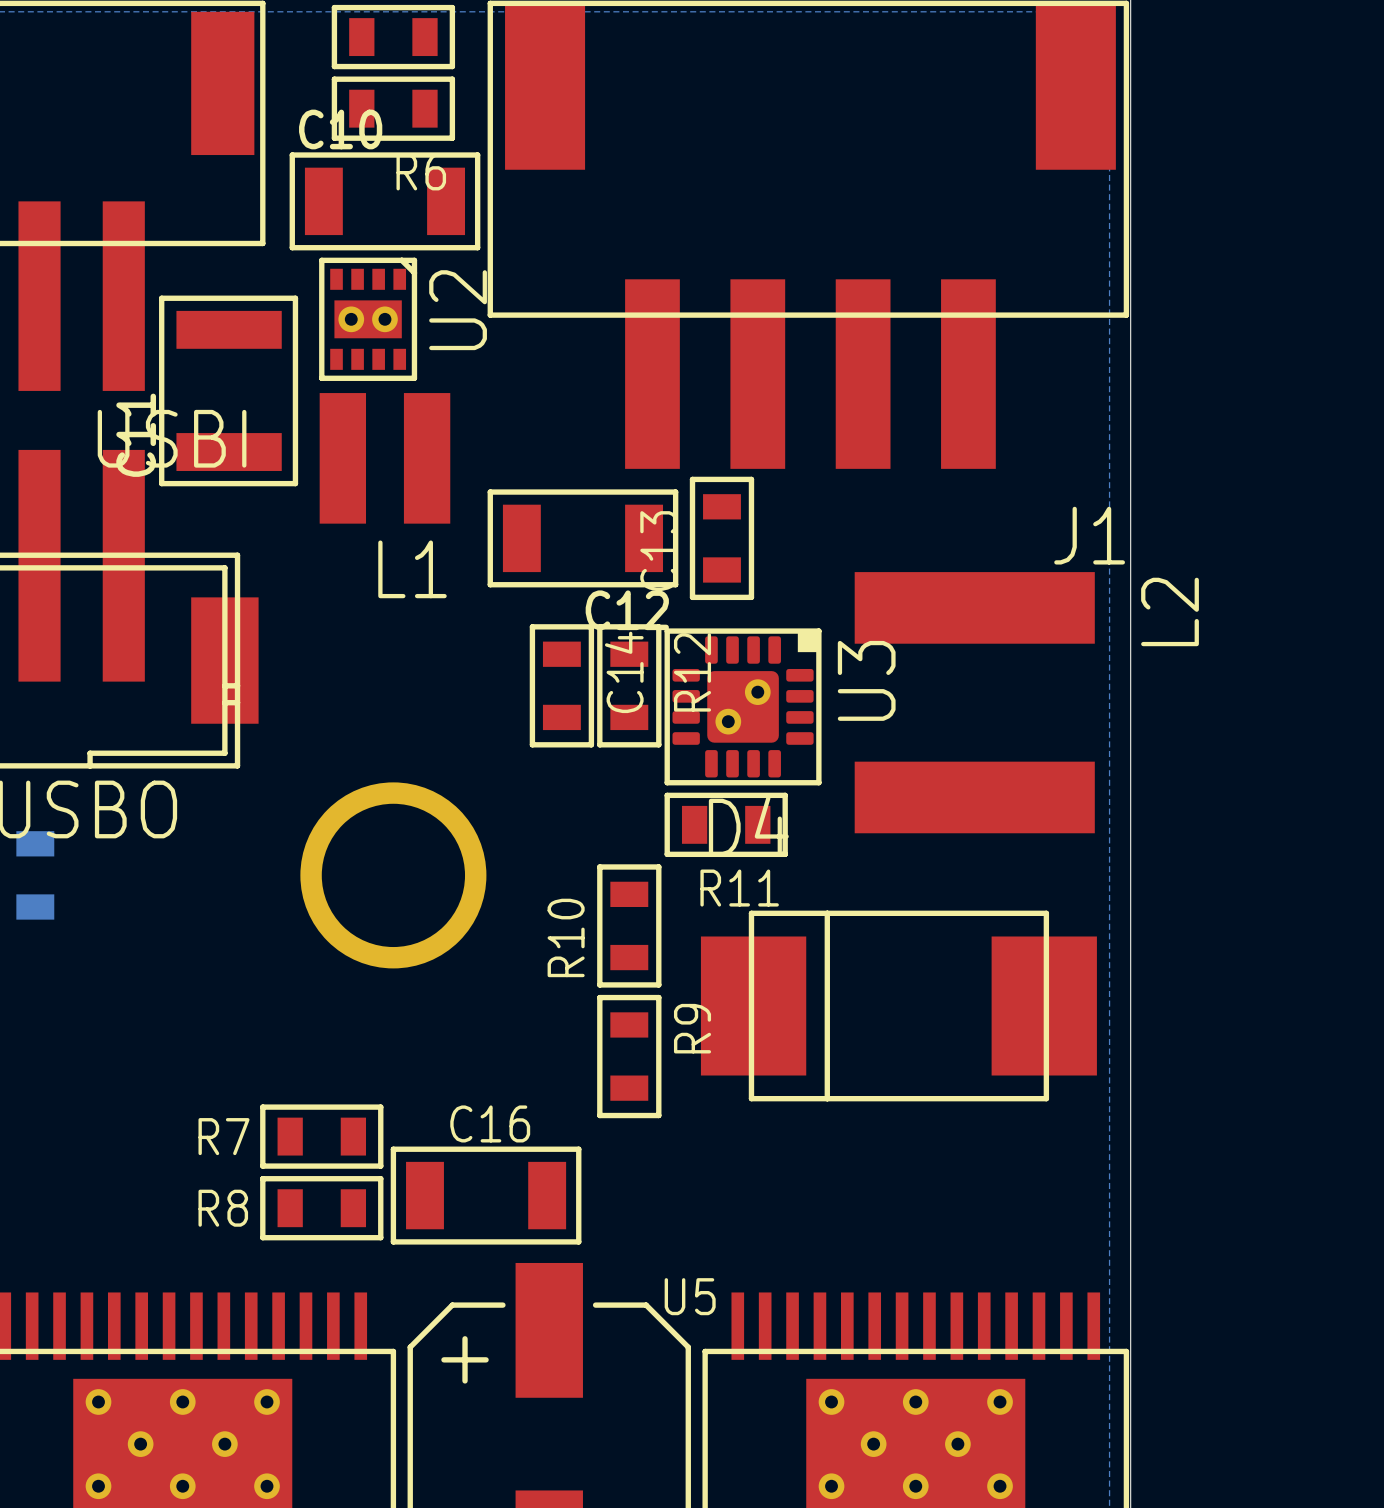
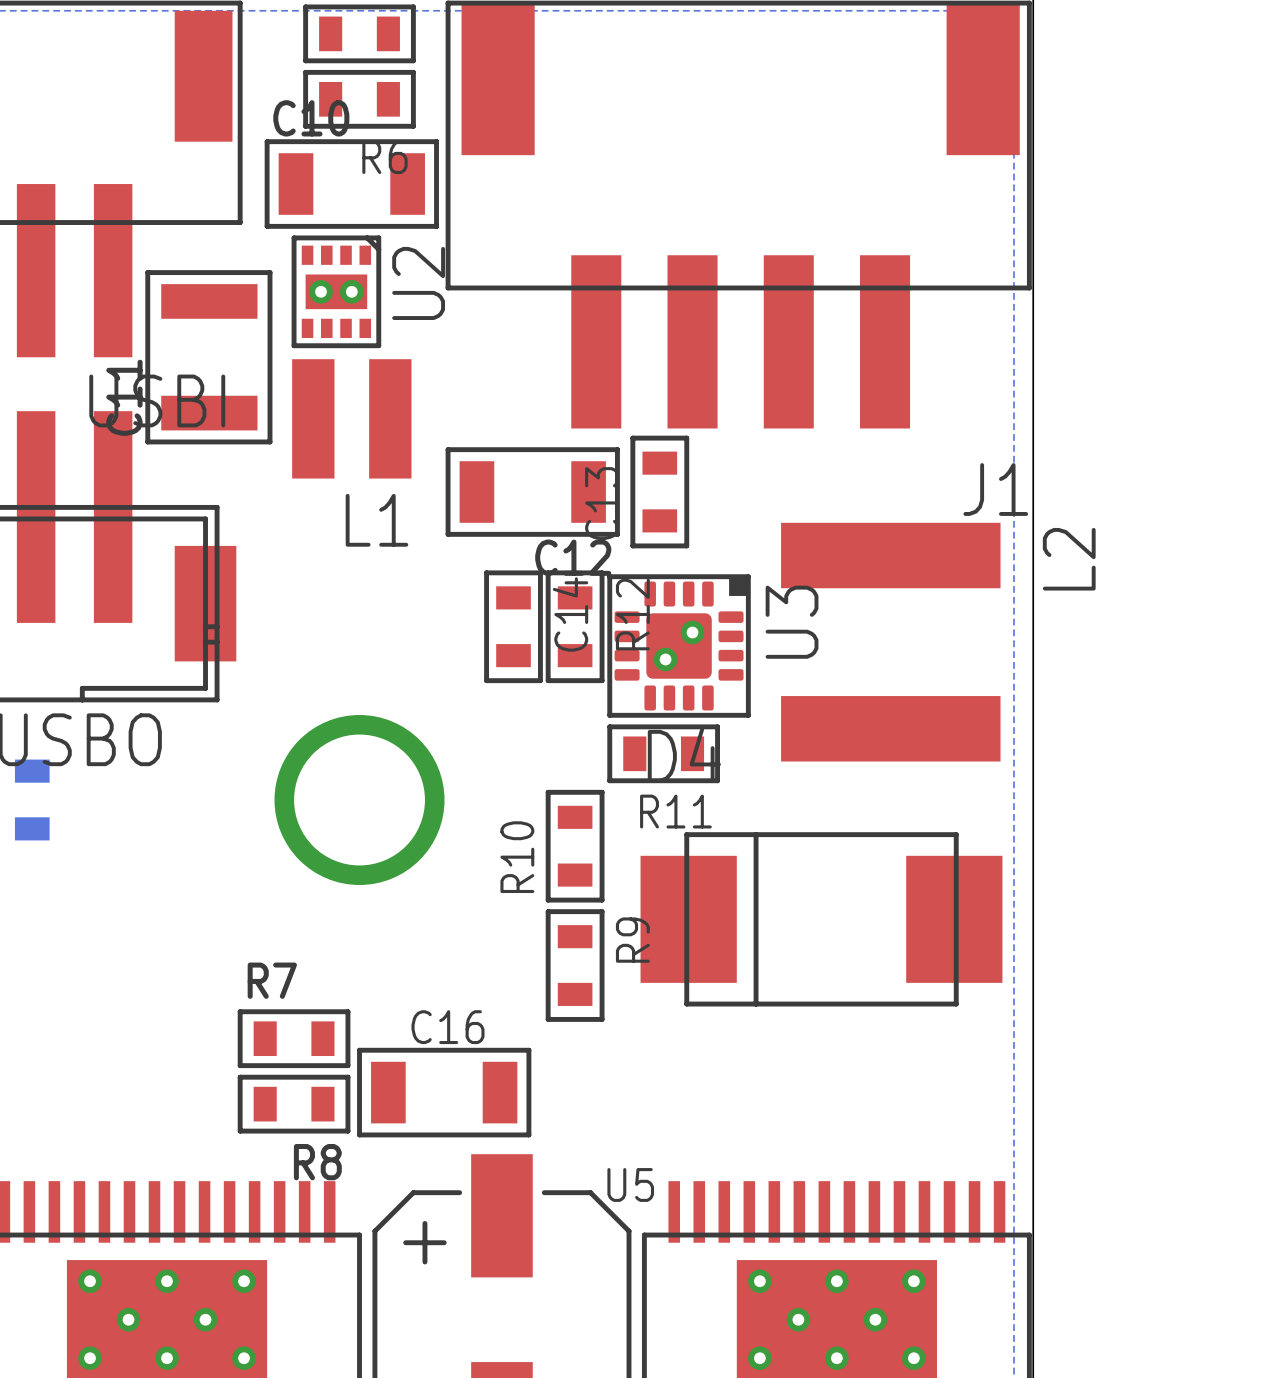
R7 name position: R7 (223, 1136) -> R7 (272, 980)
R8 name position: R8 (223, 1208) -> R8 (317, 1162)

